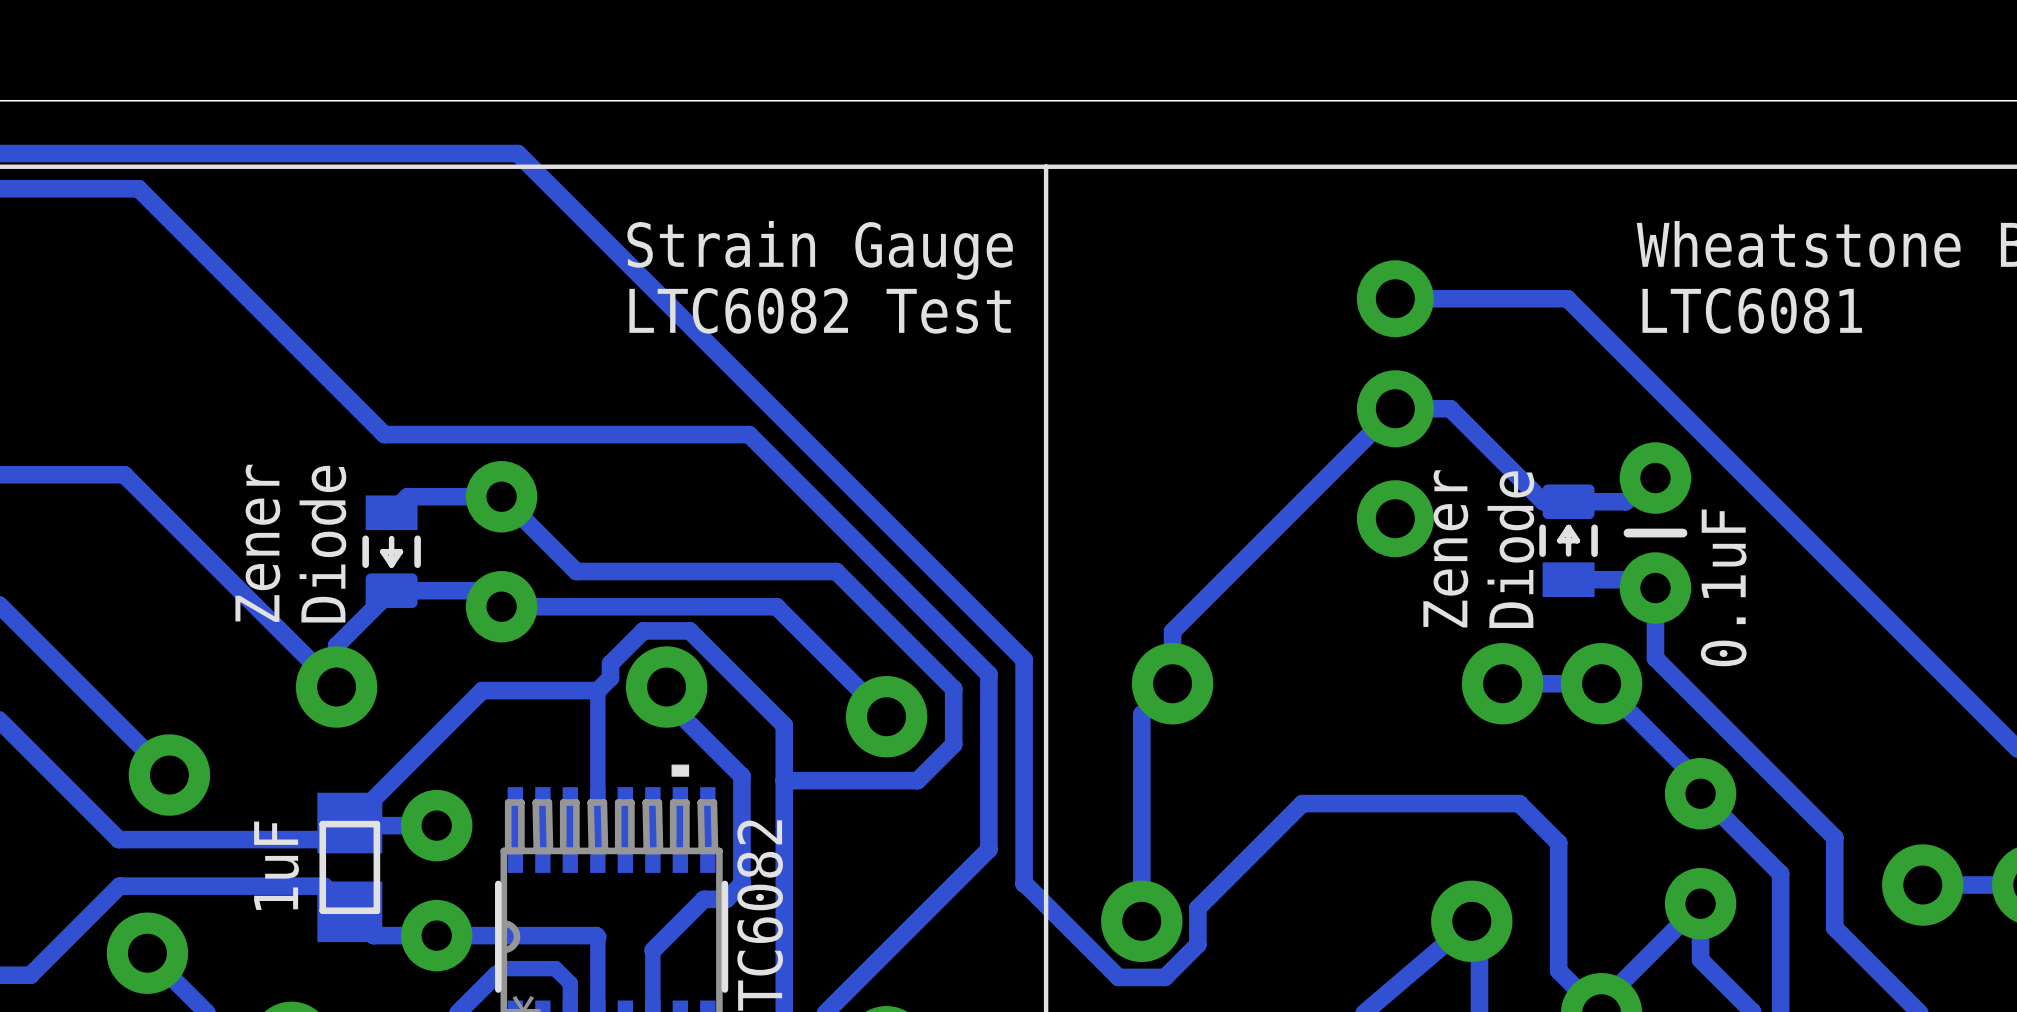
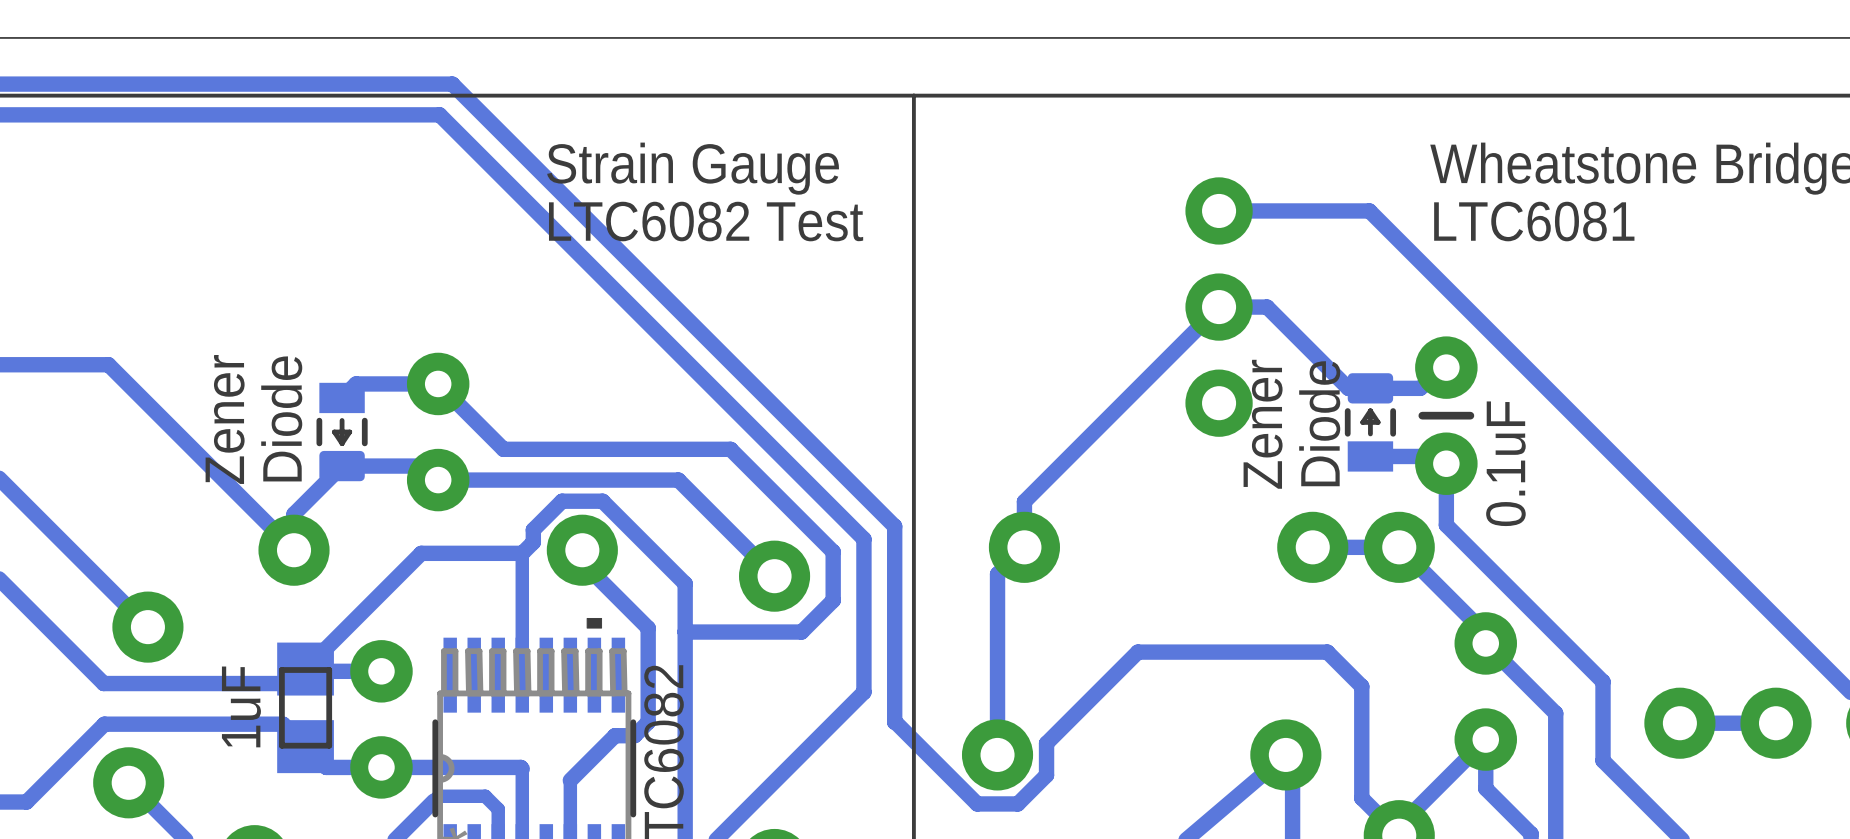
track: (138, 188) (384, 434) (749, 434) -> (121, 114) (439, 114) (654, 329)

